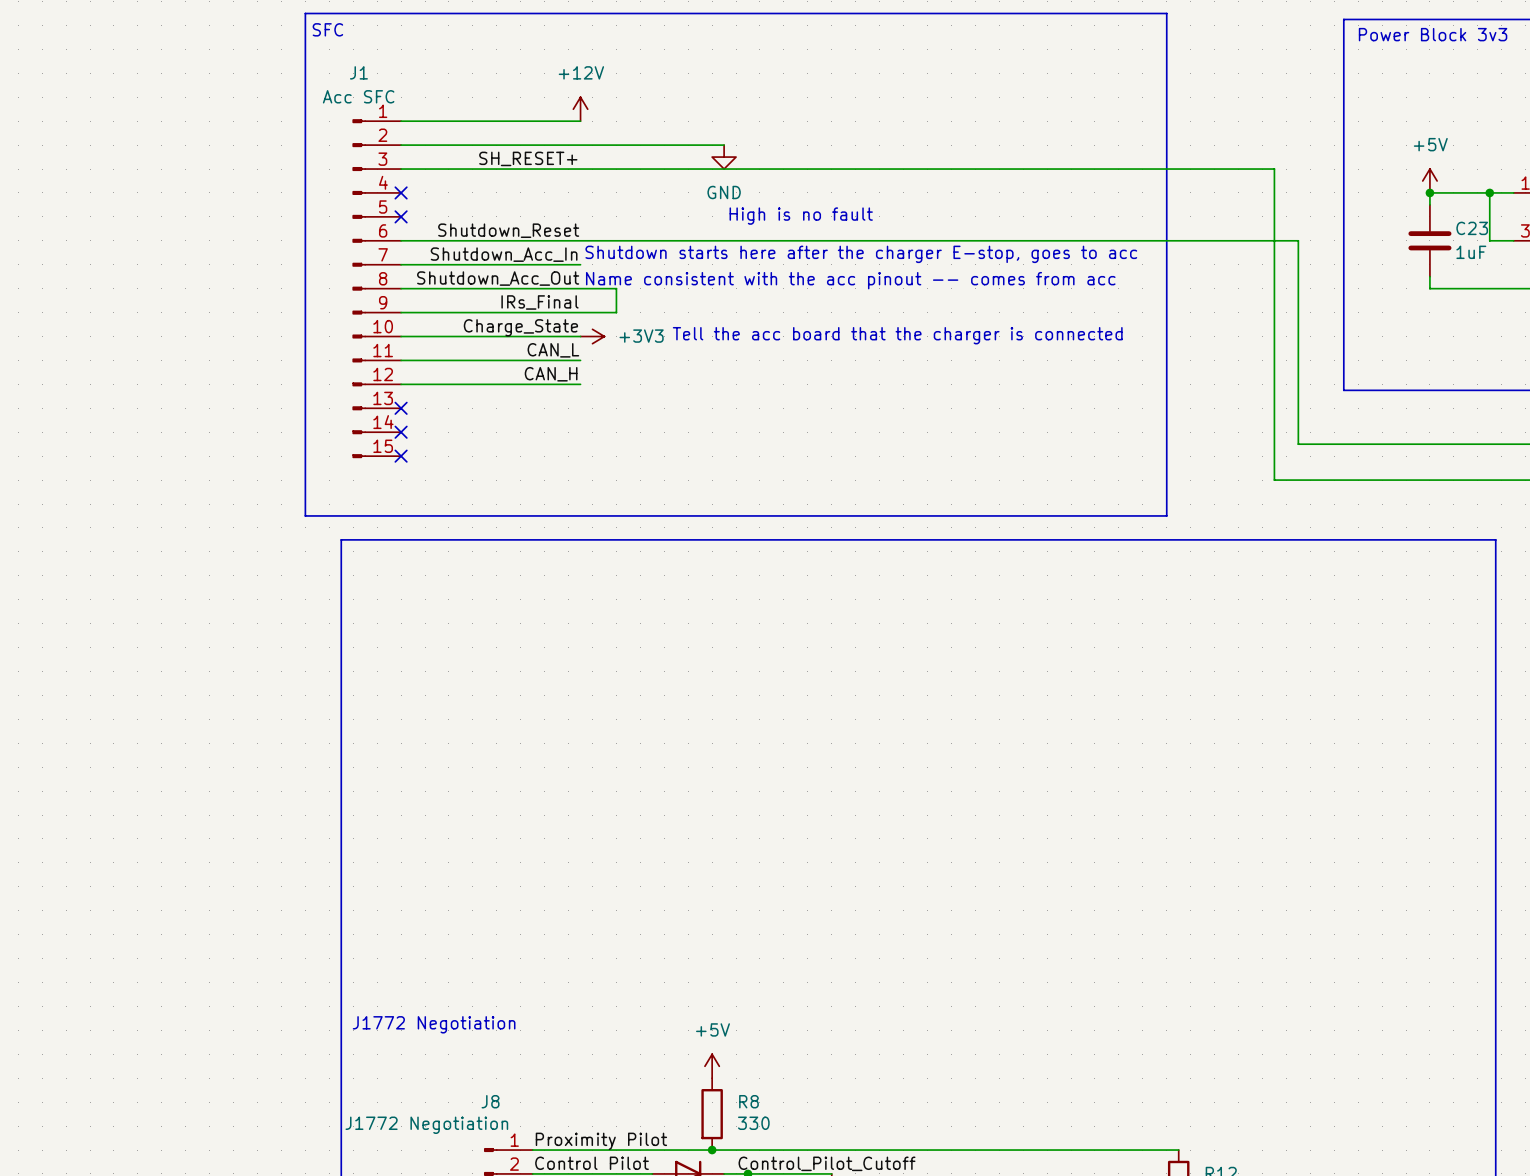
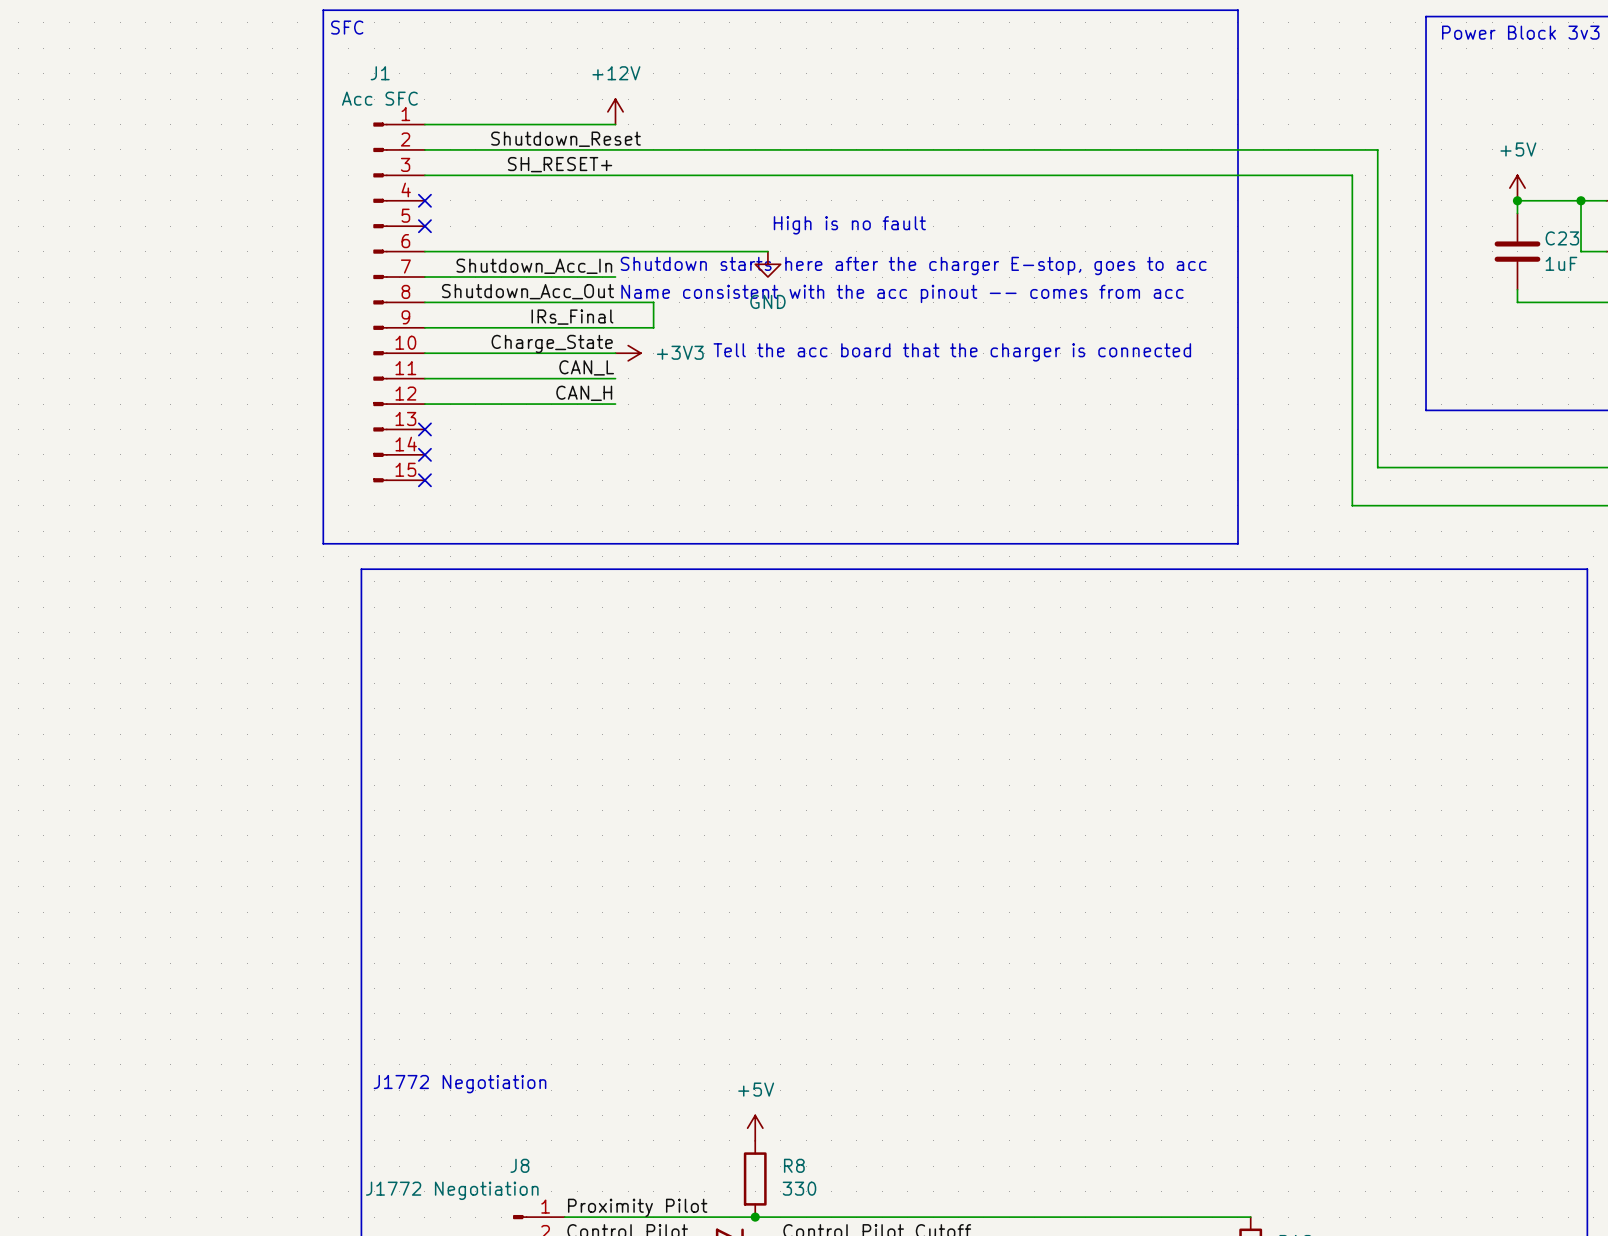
power symbol position: GND (724, 157) -> GND (767, 264)
label position: Shutdown_Reset (508, 230) -> Shutdown_Reset (565, 139)
wire: (724, 240) (1298, 240) -> (767, 149) (1377, 149) (1377, 251)

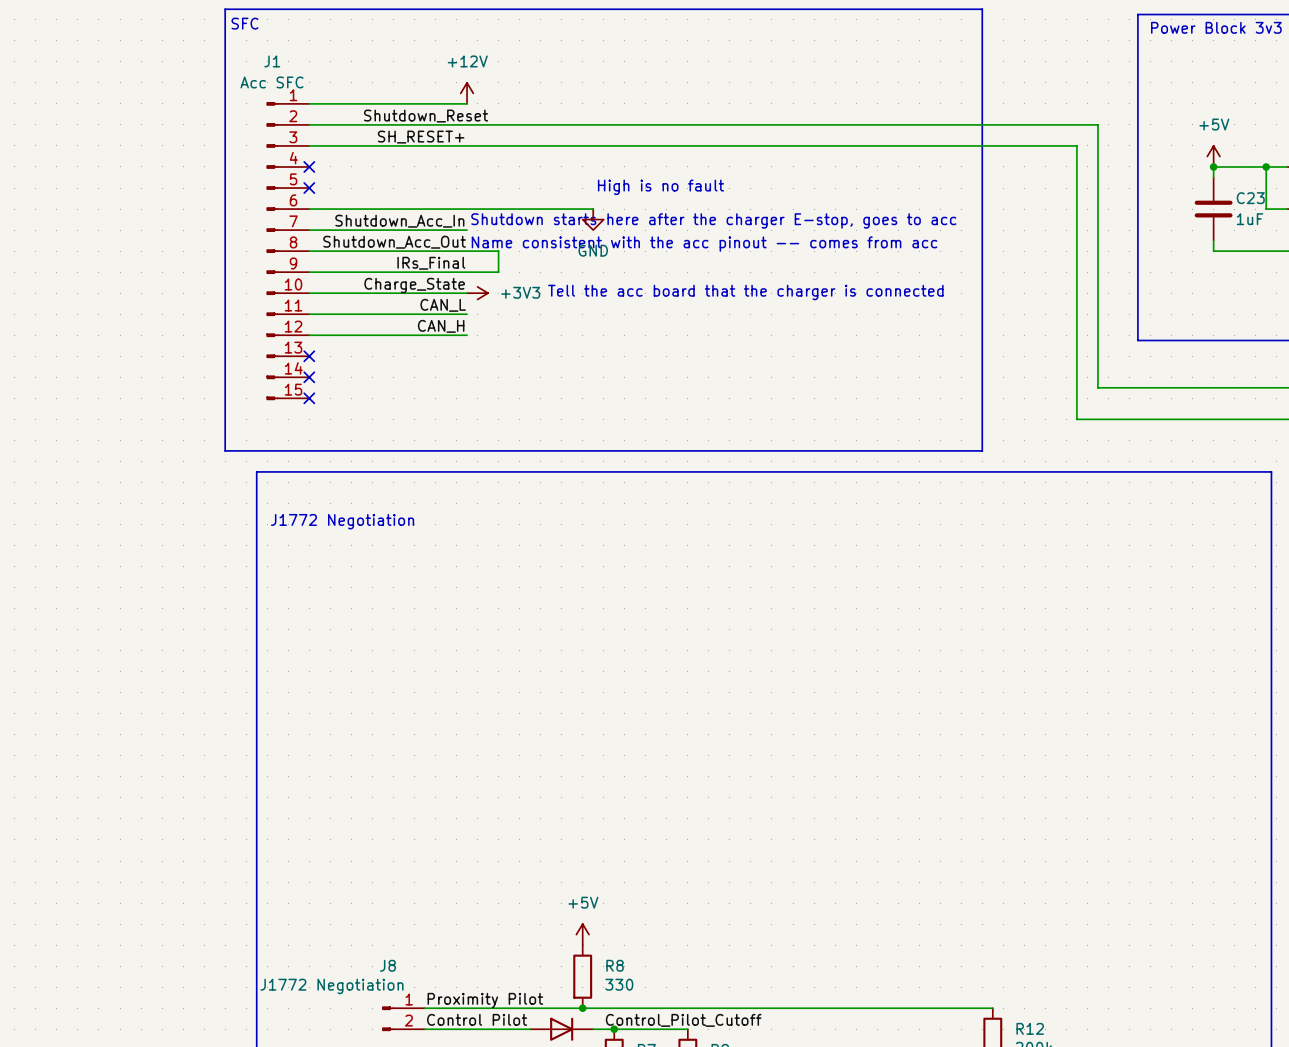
text: none -> J1772 Negotiation (342, 521)
text: J1772 Negotiation (460, 1084) -> none

